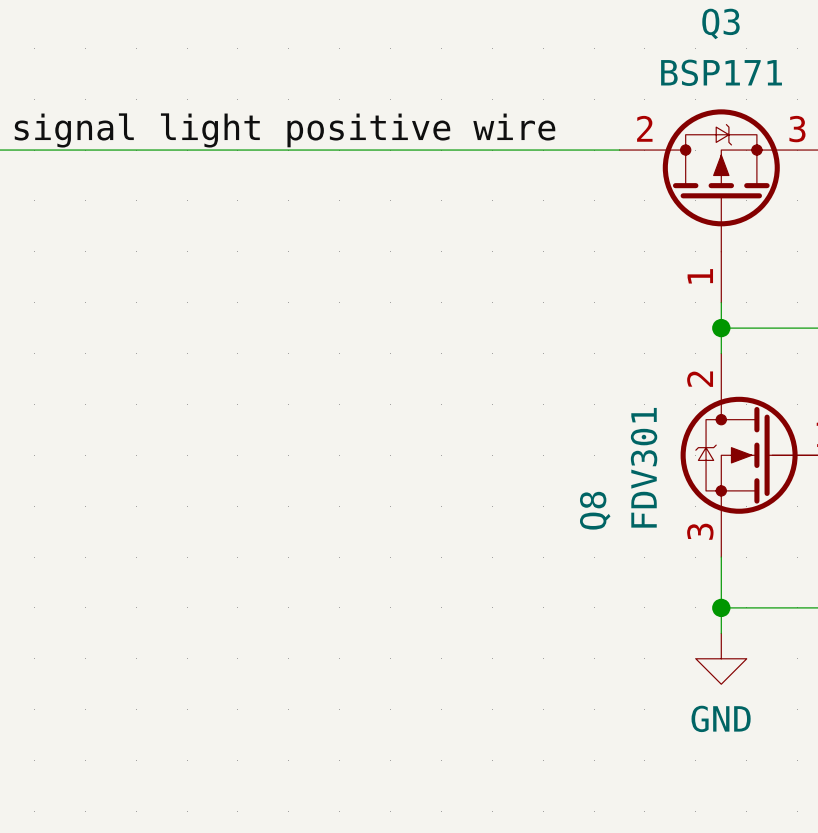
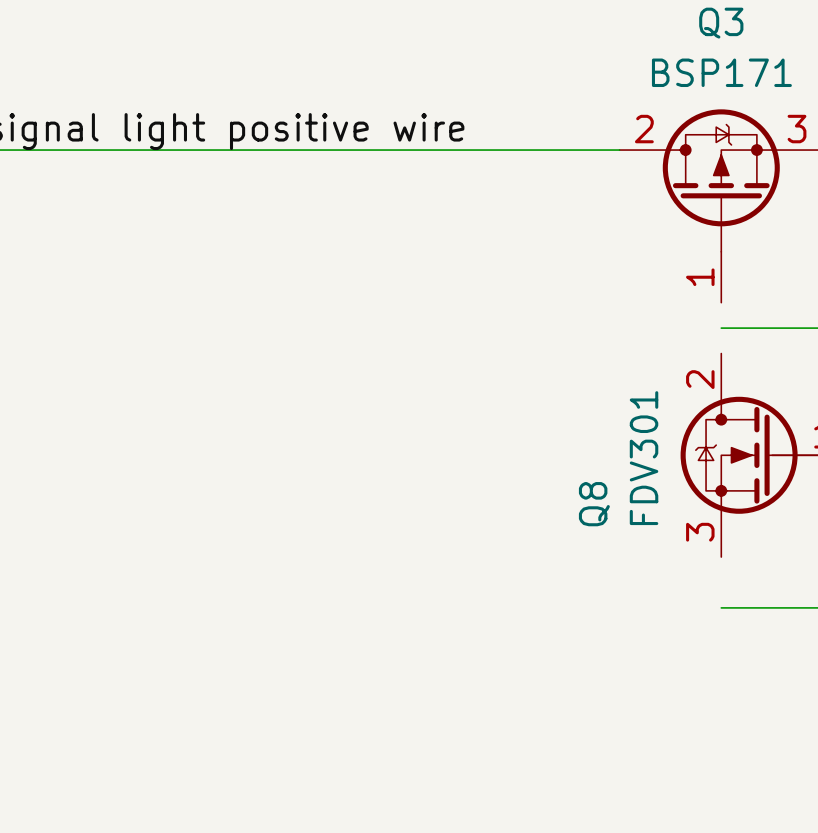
wire: (721, 302) (721, 353) -> none
junction: (721, 328) -> none
wire: (721, 557) (721, 633) -> none
junction: (721, 607) -> none
power symbol: GND (721, 658) -> none

